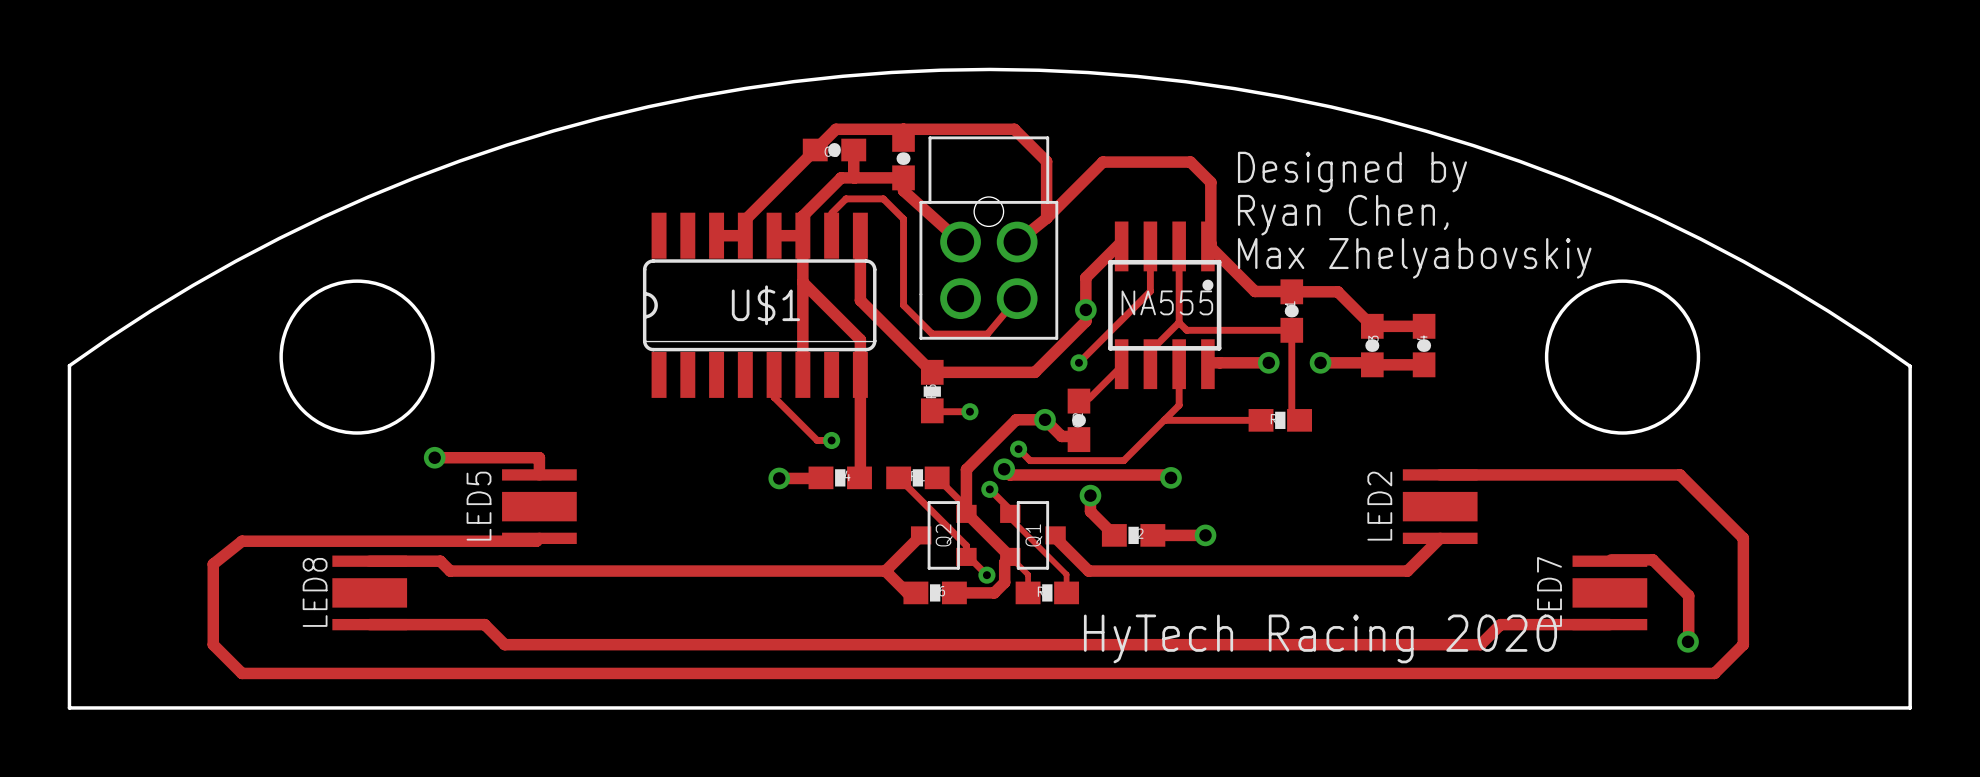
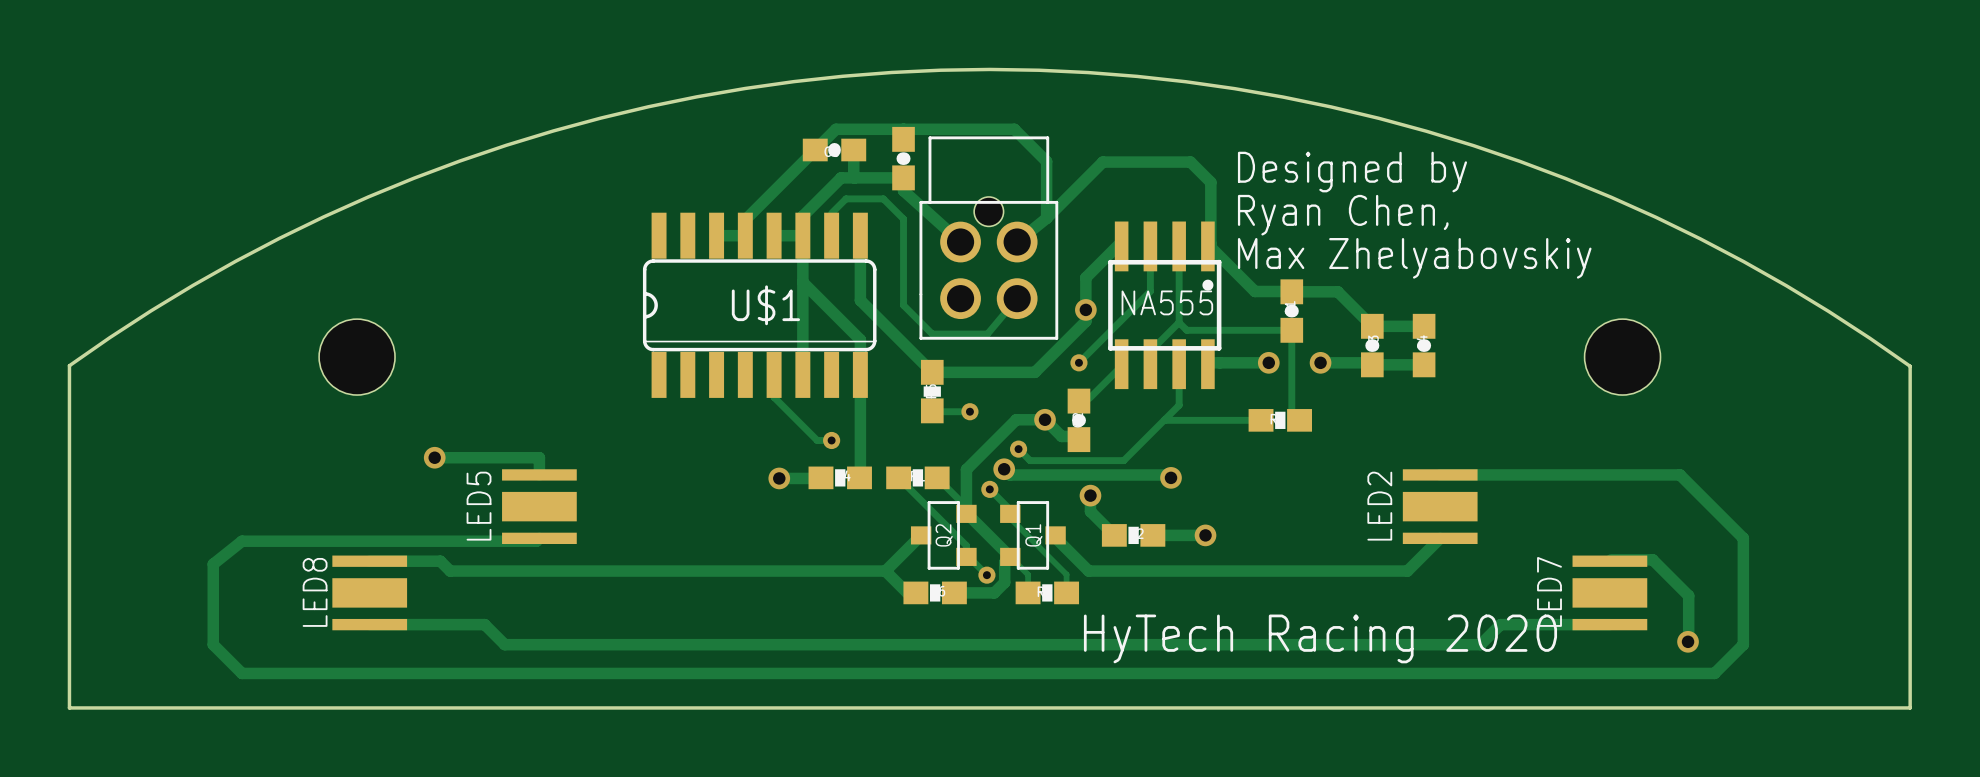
round board edge: [279, 279, 435, 435] -> none
round board edge: [1544, 279, 1701, 435] -> none
hole: none -> (357, 357)
hole: none -> (1622, 357)

